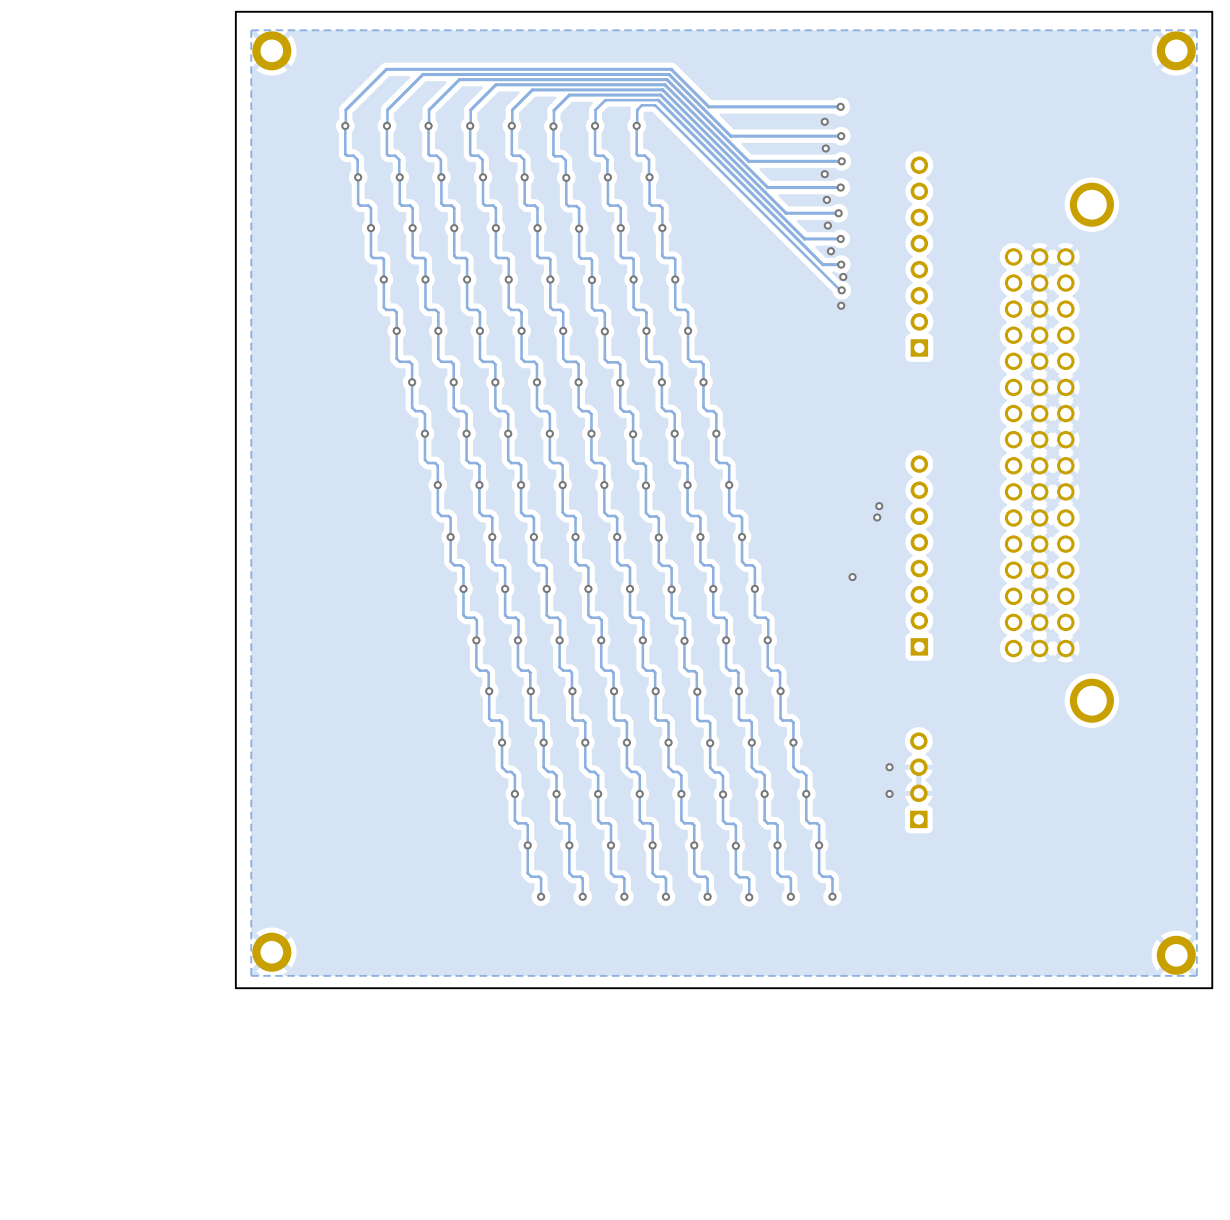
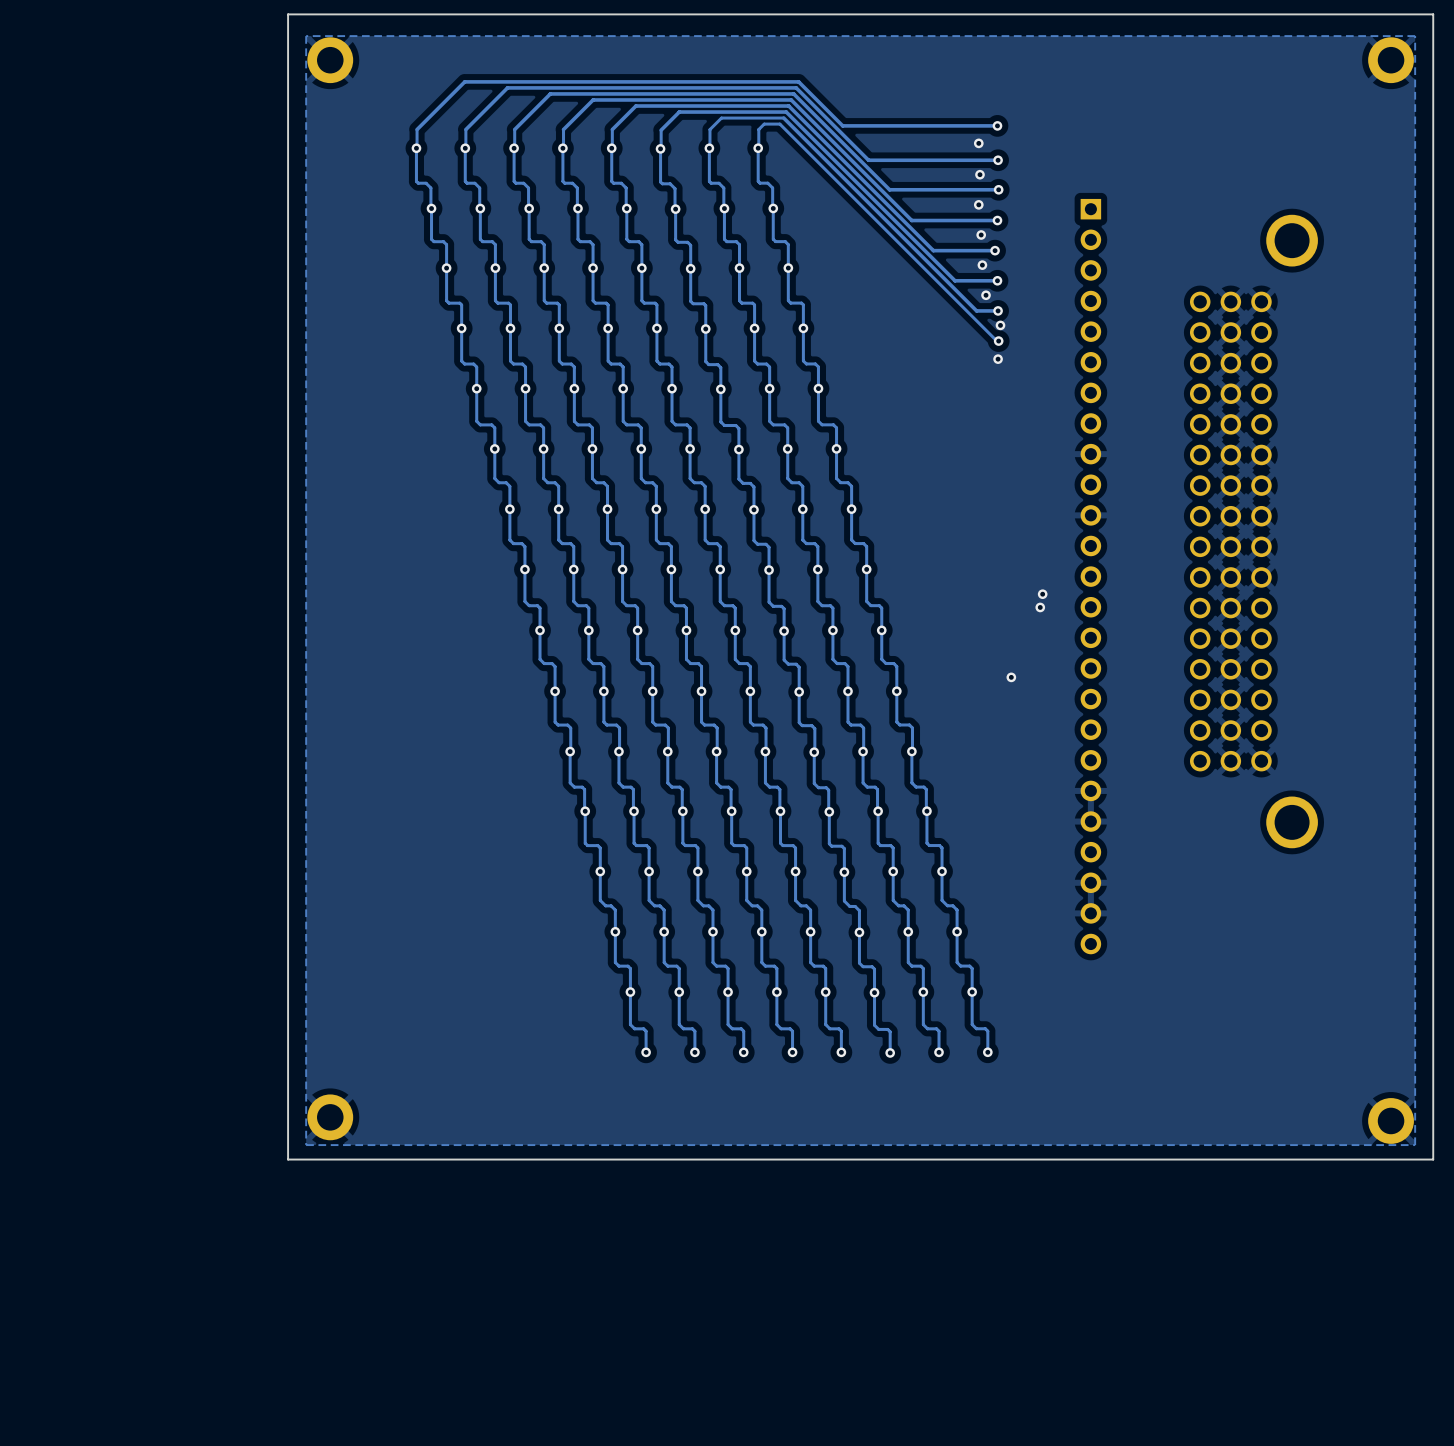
part: (919, 256) -> none
part: none -> (1090, 576)
part: (919, 555) -> none
via: (889, 767) -> none
part: (918, 780) -> none
via: (889, 793) -> none

